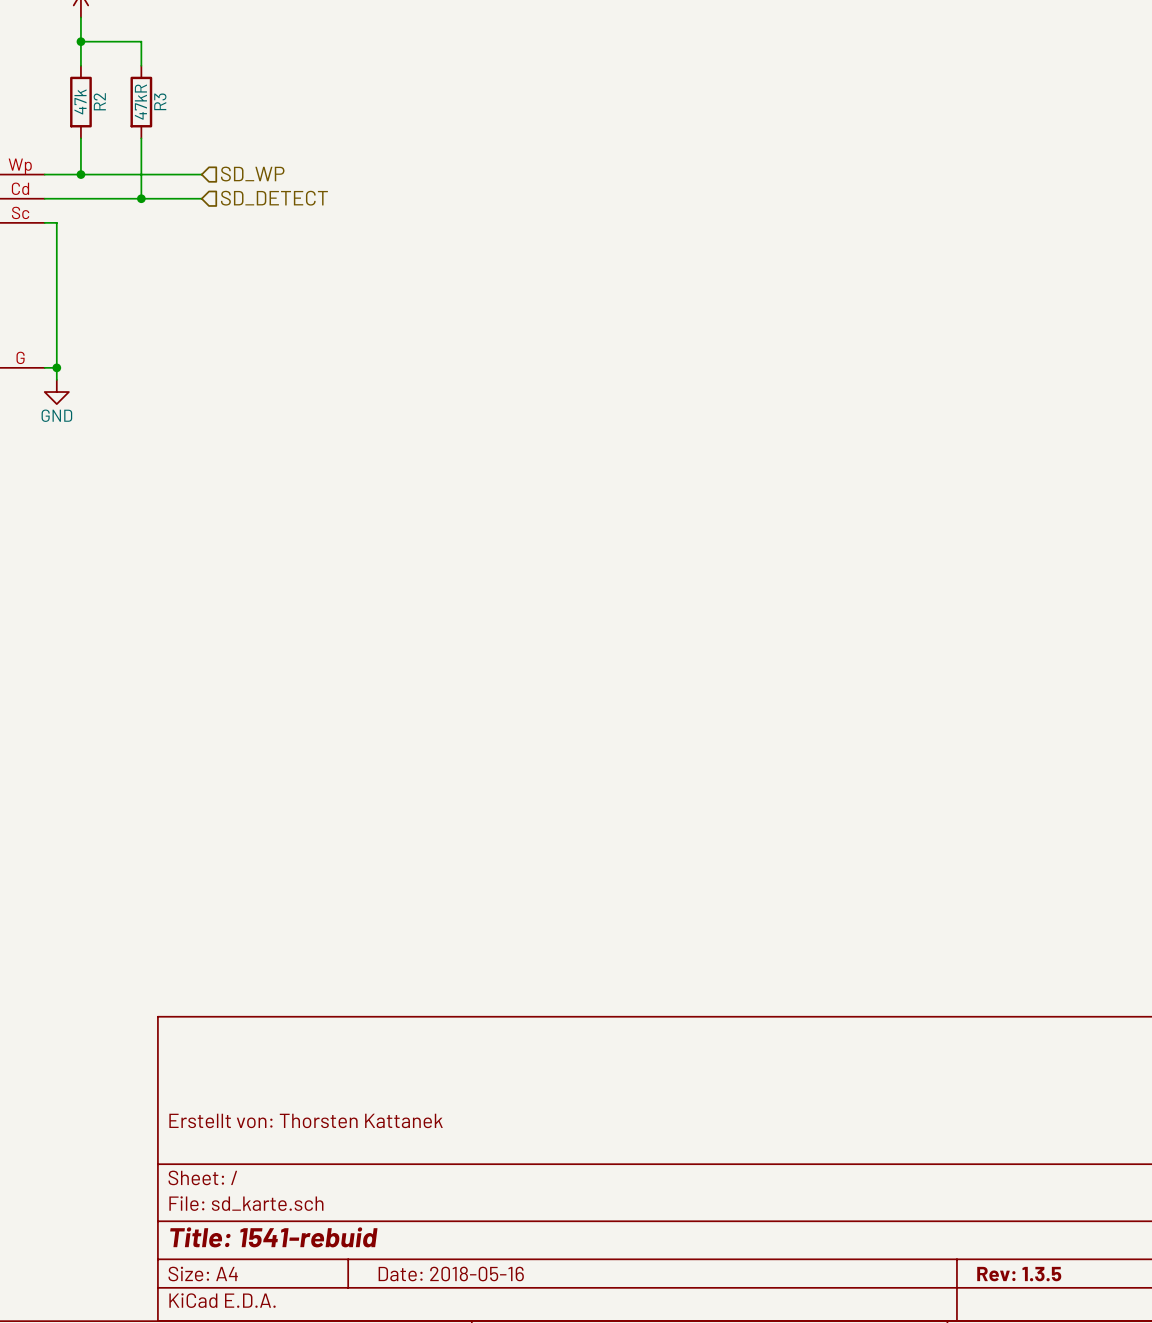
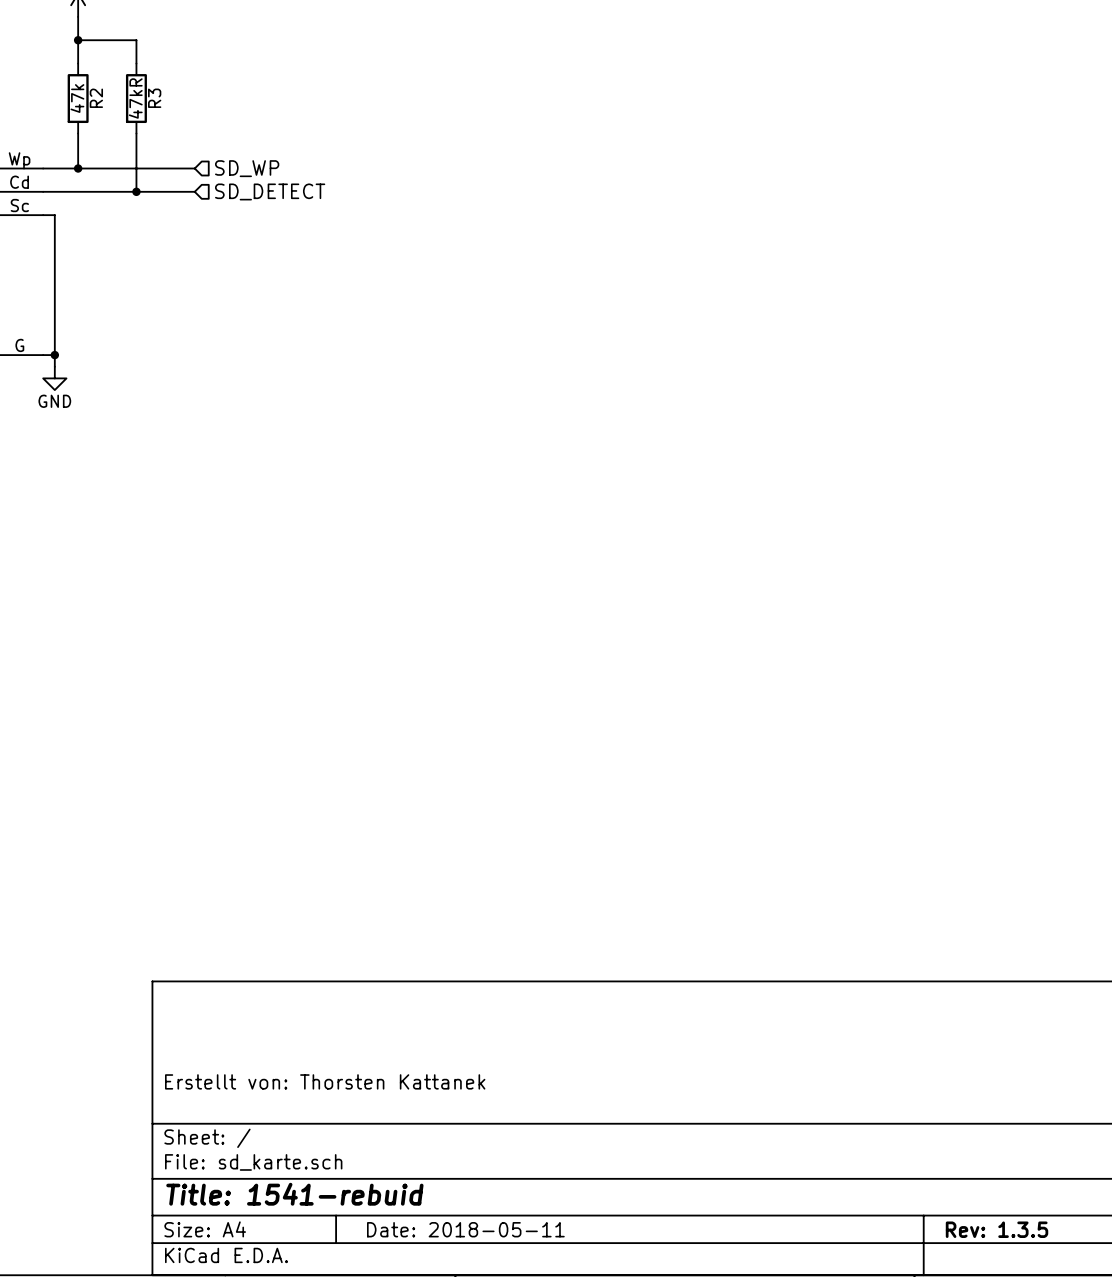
title block: Date: 2018-05-16 (451, 1274) -> Date: 2018-05-11 (465, 1229)

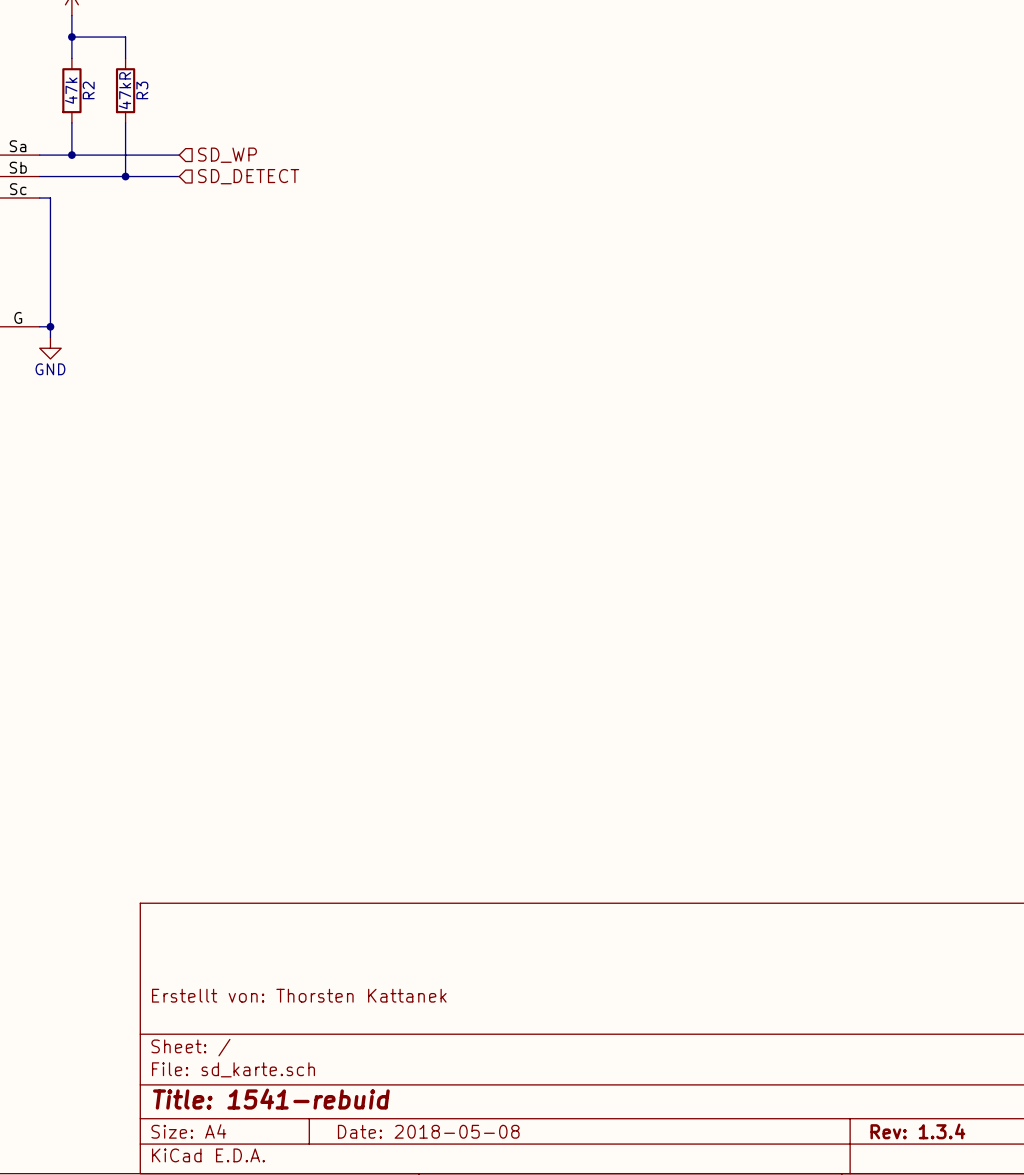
part pin number: Wp (19, 160) -> Sa (18, 146)
part pin number: Cd (19, 182) -> Sb (18, 167)
title block: Date: 2018-05-11 (465, 1229) -> Date: 2018-05-08 (428, 1131)
title block: Rev: 1.3.5 (997, 1229) -> Rev: 1.3.4 (917, 1131)

